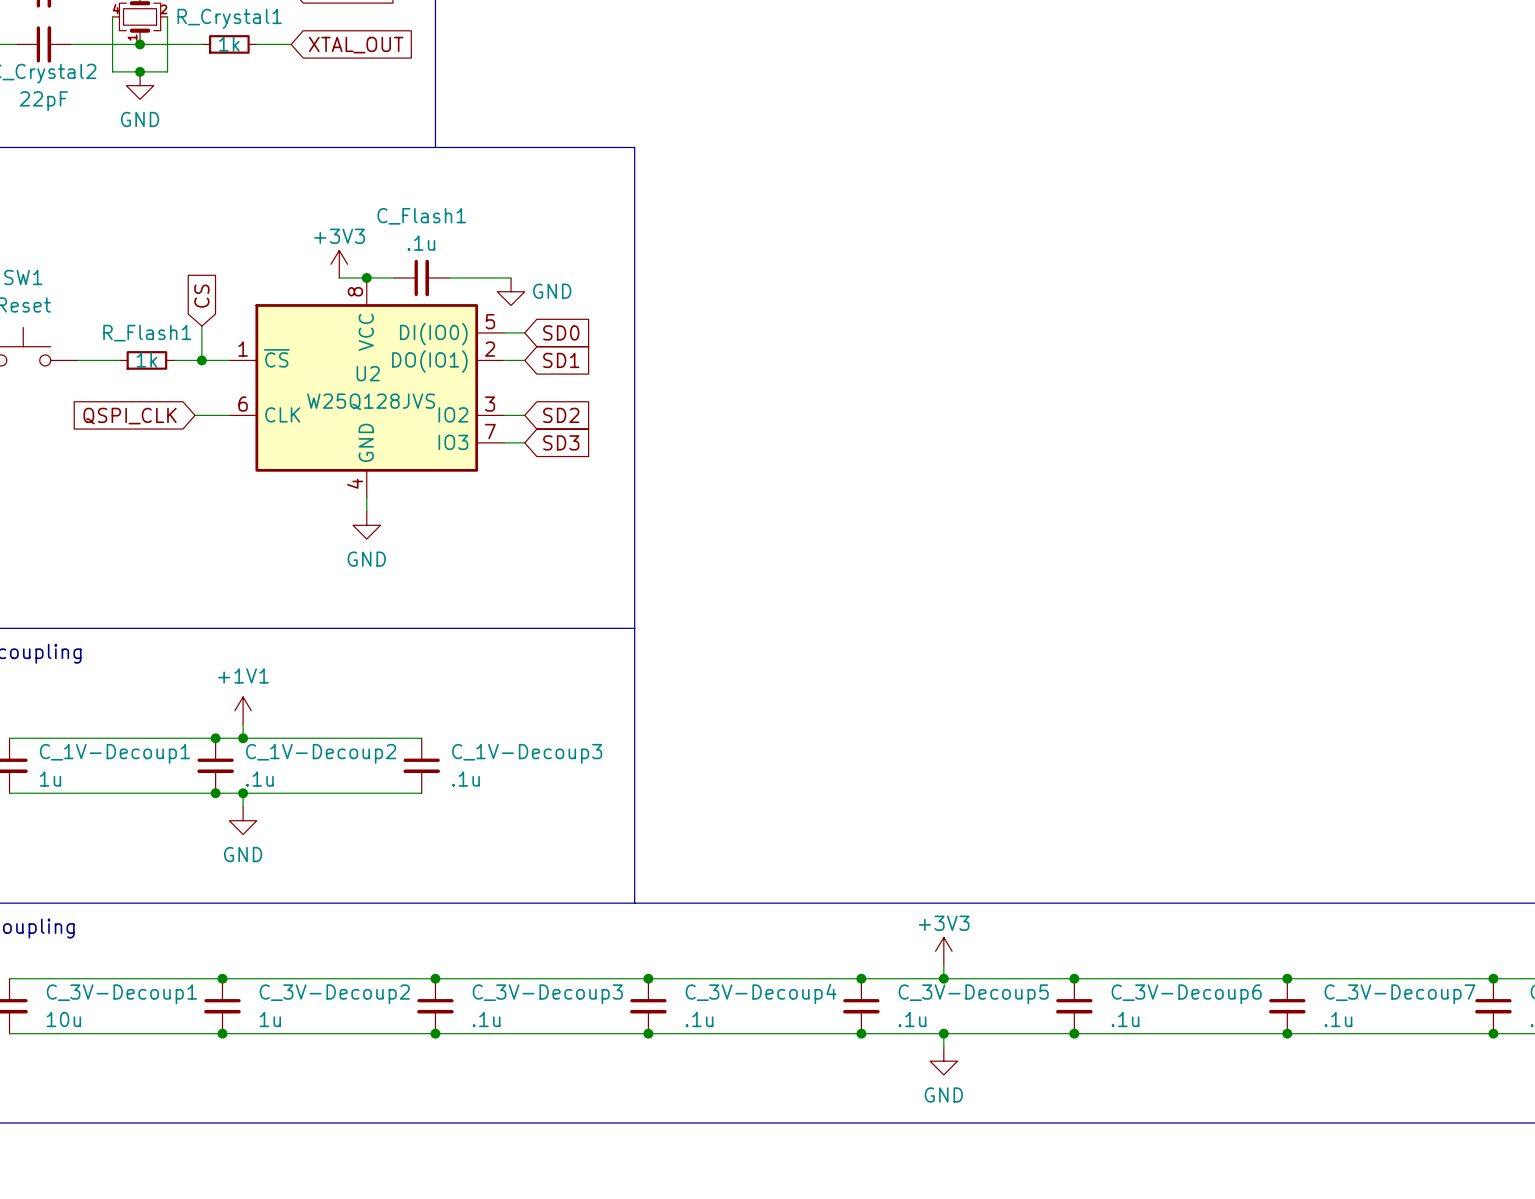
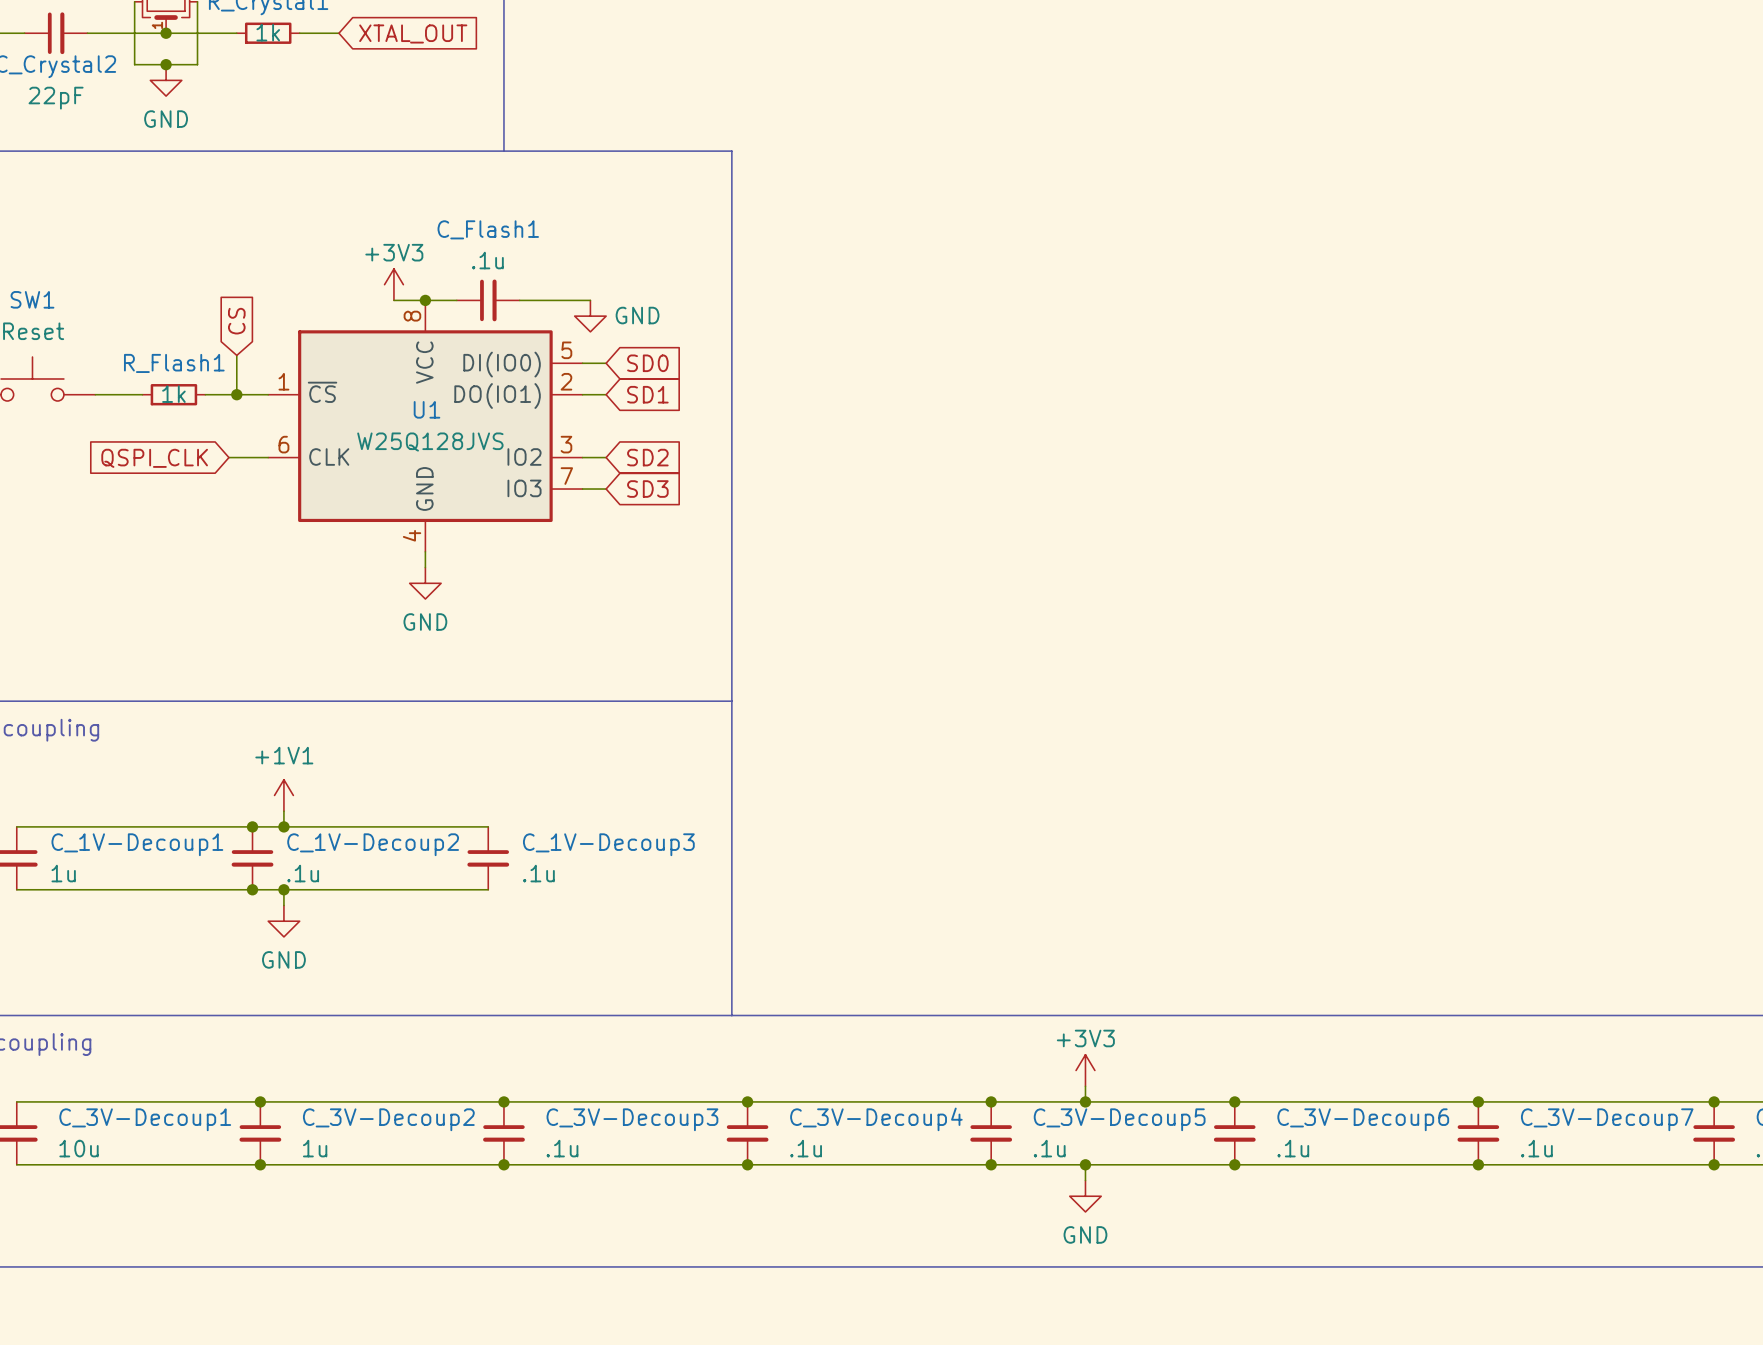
U2 name: U2 (368, 373) -> U1 (427, 409)

